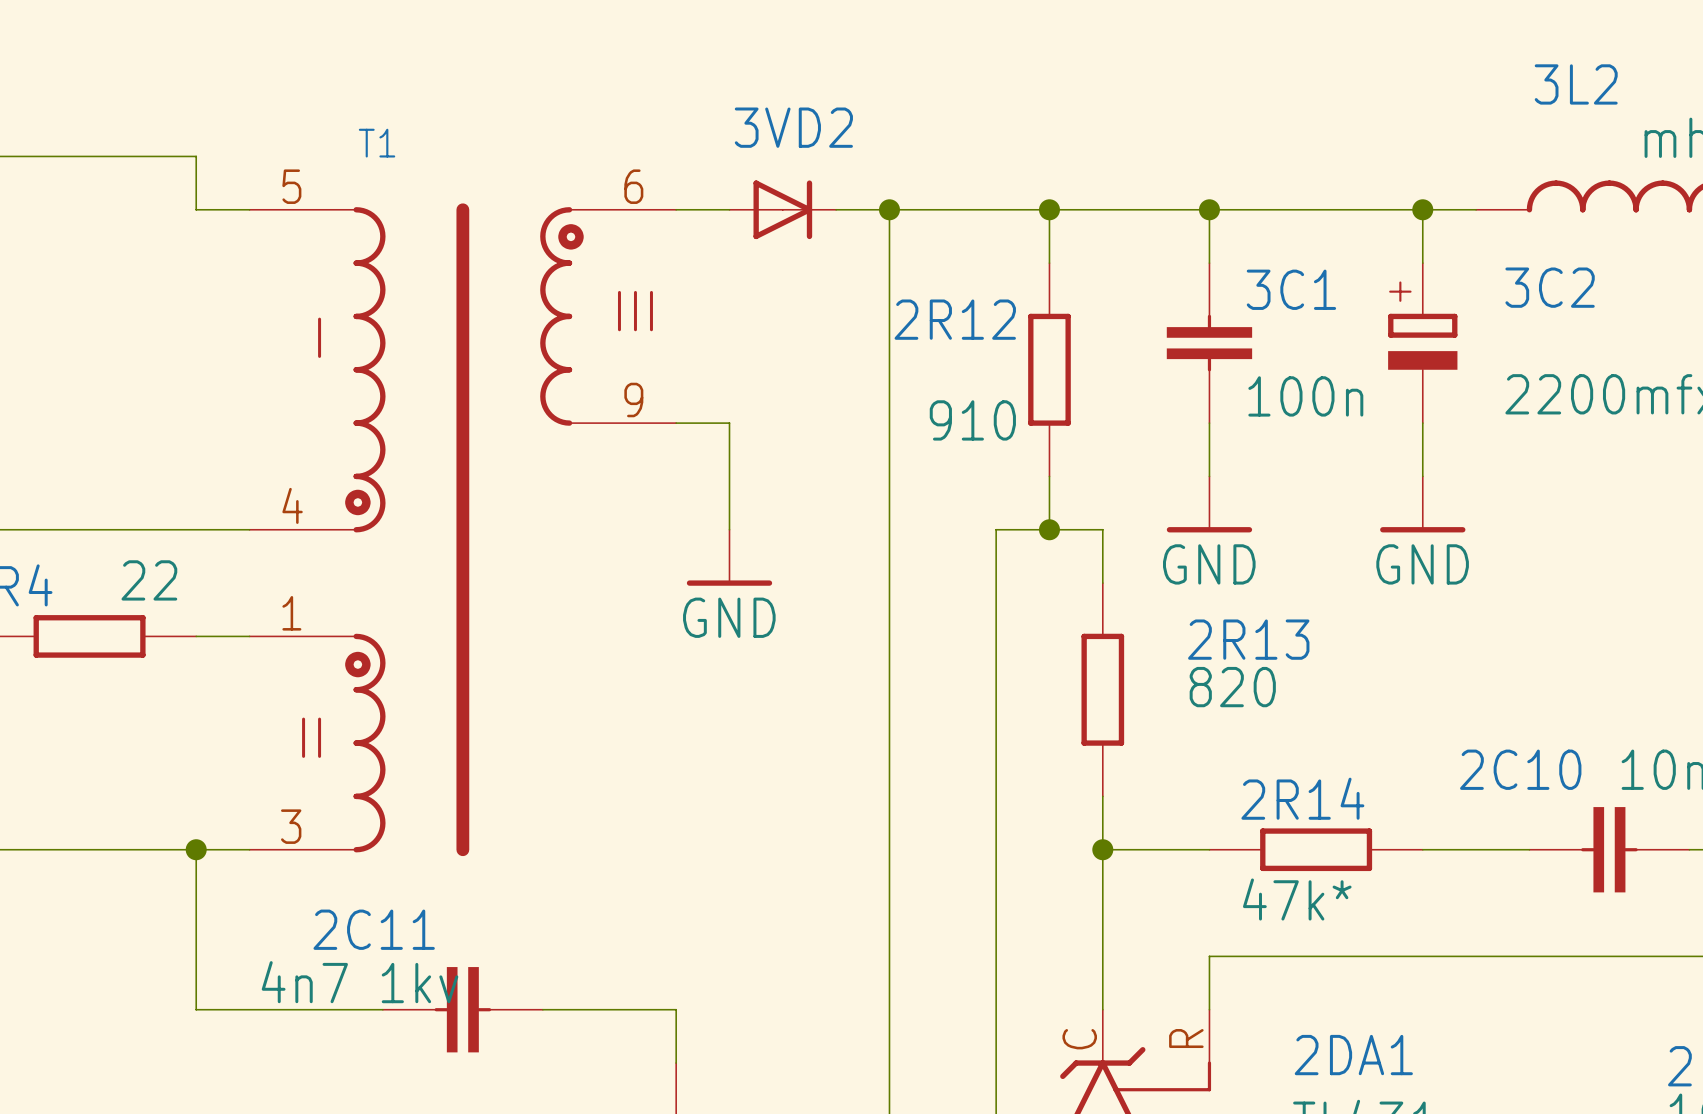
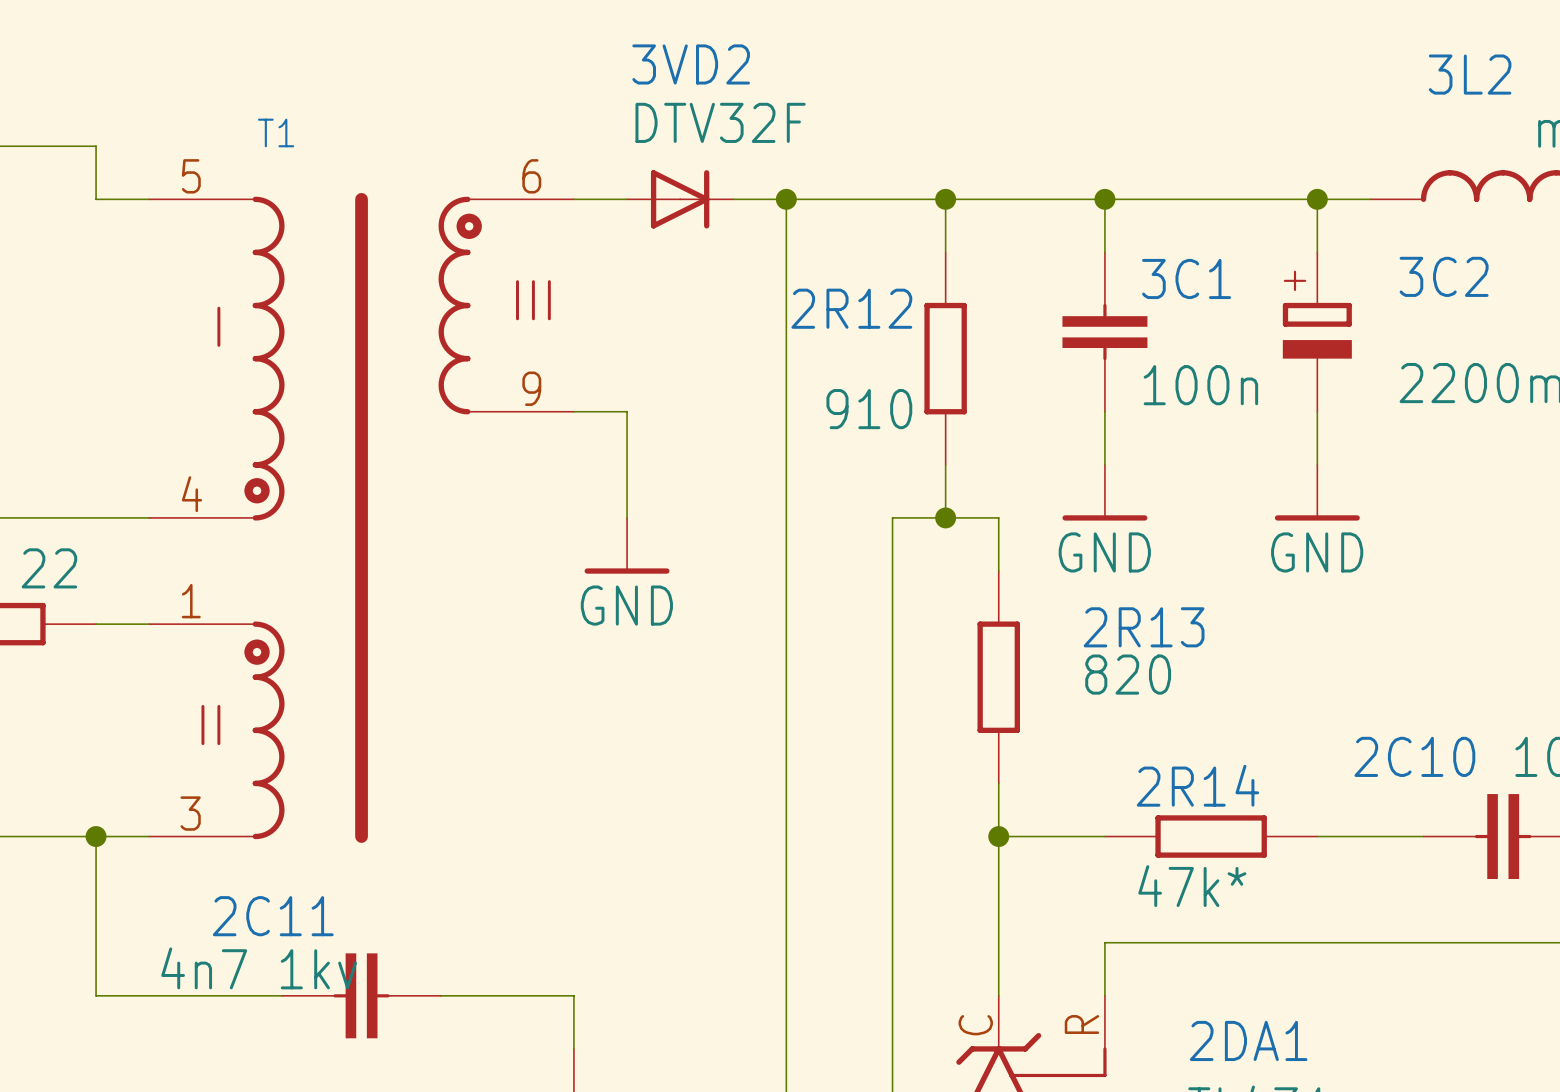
3VD2 name position: 3VD2 (793, 127) -> 3VD2 (691, 64)
3VD2 value: none -> DTV32F (720, 122)

